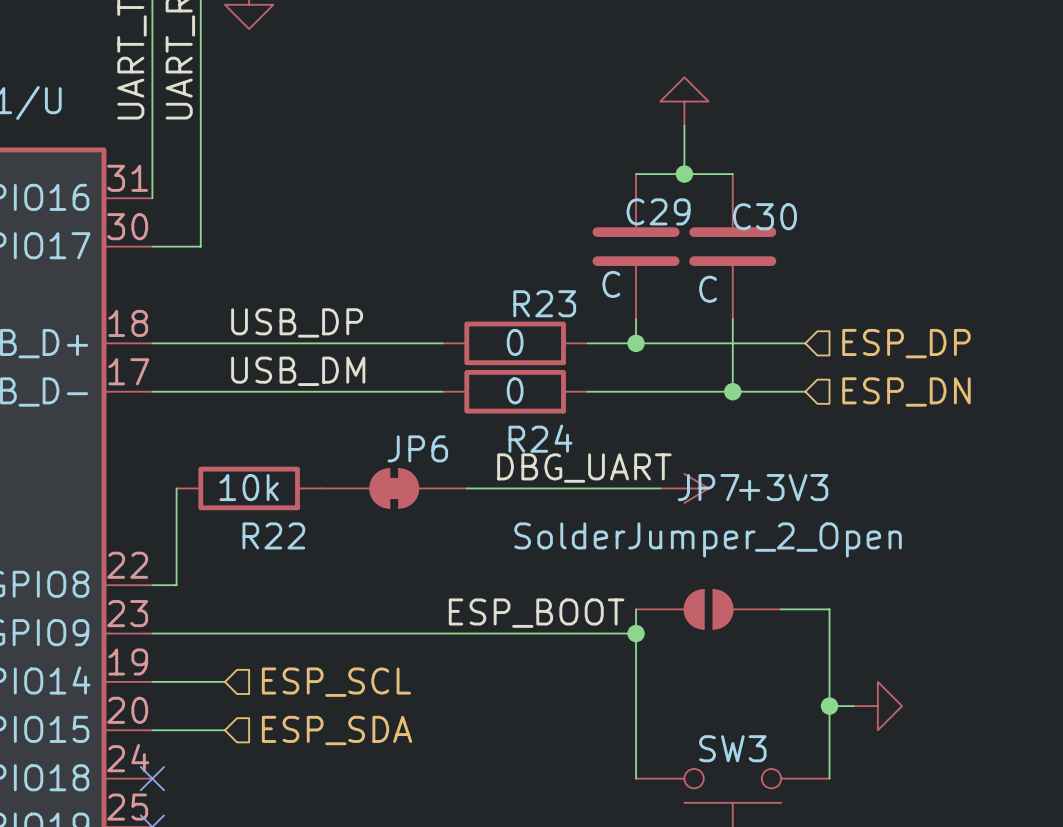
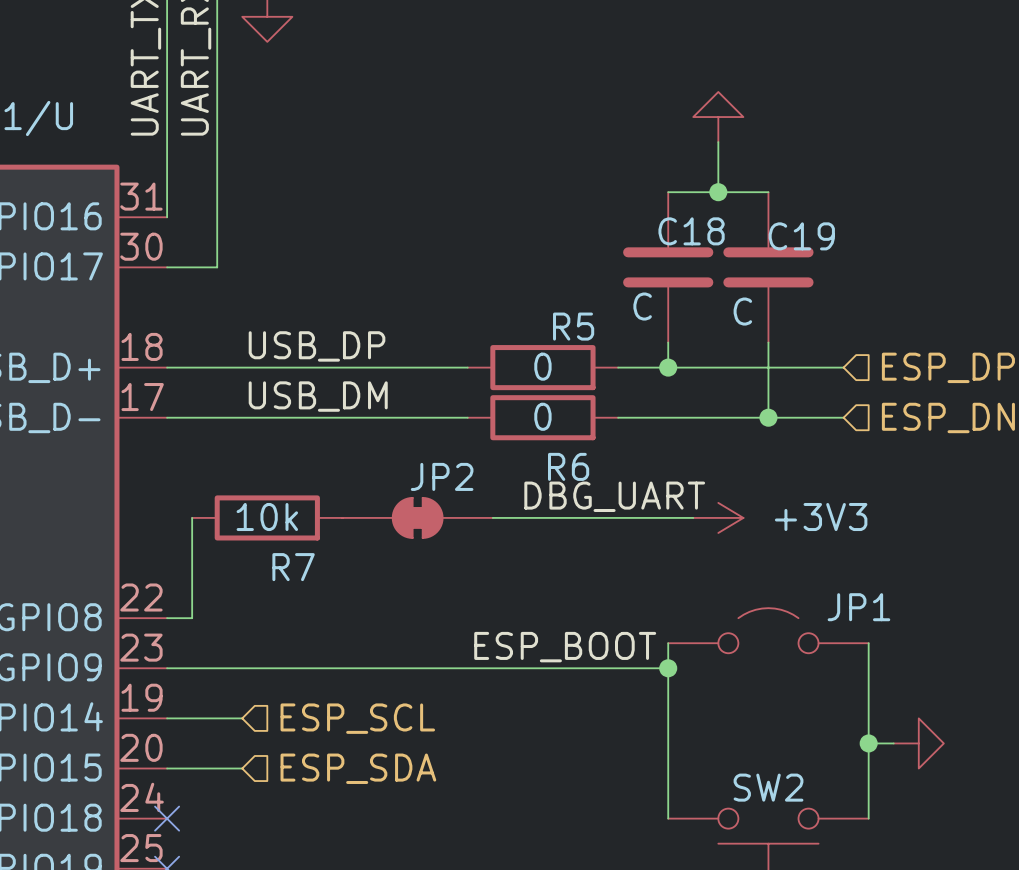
C29 name: C29 (658, 211) -> C18 (691, 231)
C30 name: C30 (764, 216) -> C19 (801, 236)
R23 name: R23 (544, 303) -> R5 (573, 326)
R24 name: R24 (540, 438) -> R6 (568, 466)
JP6 name: JP6 (417, 448) -> JP2 (442, 476)
R22 name: R22 (273, 535) -> R7 (293, 567)
JP1: none -> (768, 630)
JP7: SolderJumper_2_Open (708, 609) -> none
SW3 name: SW3 (732, 748) -> SW2 (768, 787)

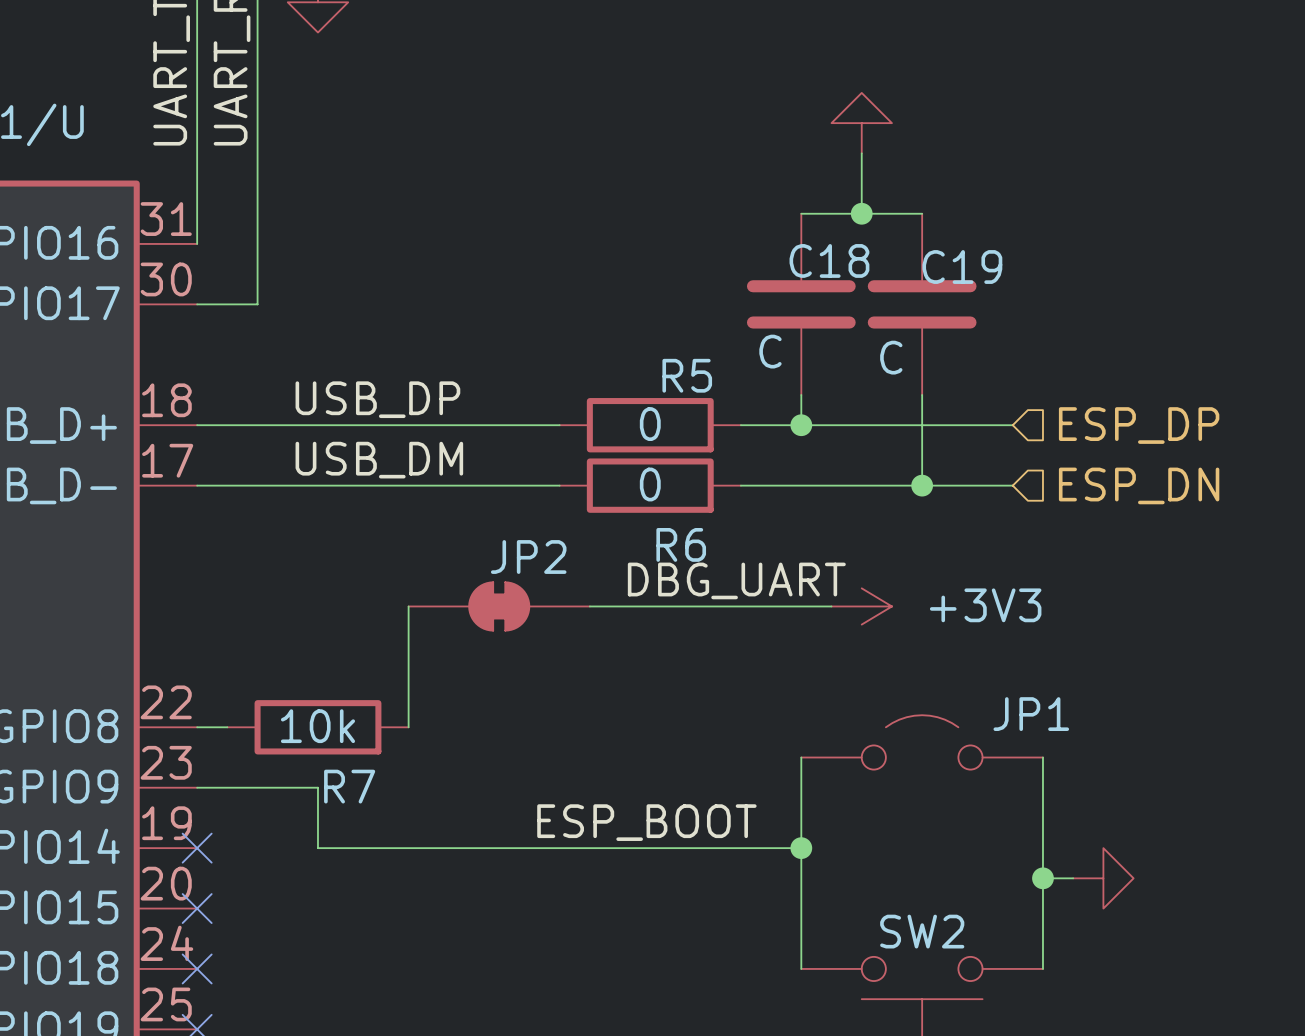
wire: (192, 517) (192, 618) -> (408, 606) (408, 727)
R7 position: (267, 517) -> (317, 727)
label position: ESP_BOOT (565, 647) -> ESP_BOOT (646, 822)
wire: (267, 668) (668, 668) -> (317, 787) (317, 848) (801, 848)
junction position: (668, 668) -> (801, 848)
wire: (167, 718) (242, 718) -> none
no-connect mark: none -> (197, 848)
hierarchical label: ESP_SCL (357, 718) -> none
wire: (167, 768) (242, 768) -> none
no-connect mark: none -> (197, 908)
hierarchical label: ESP_SDA (358, 768) -> none

